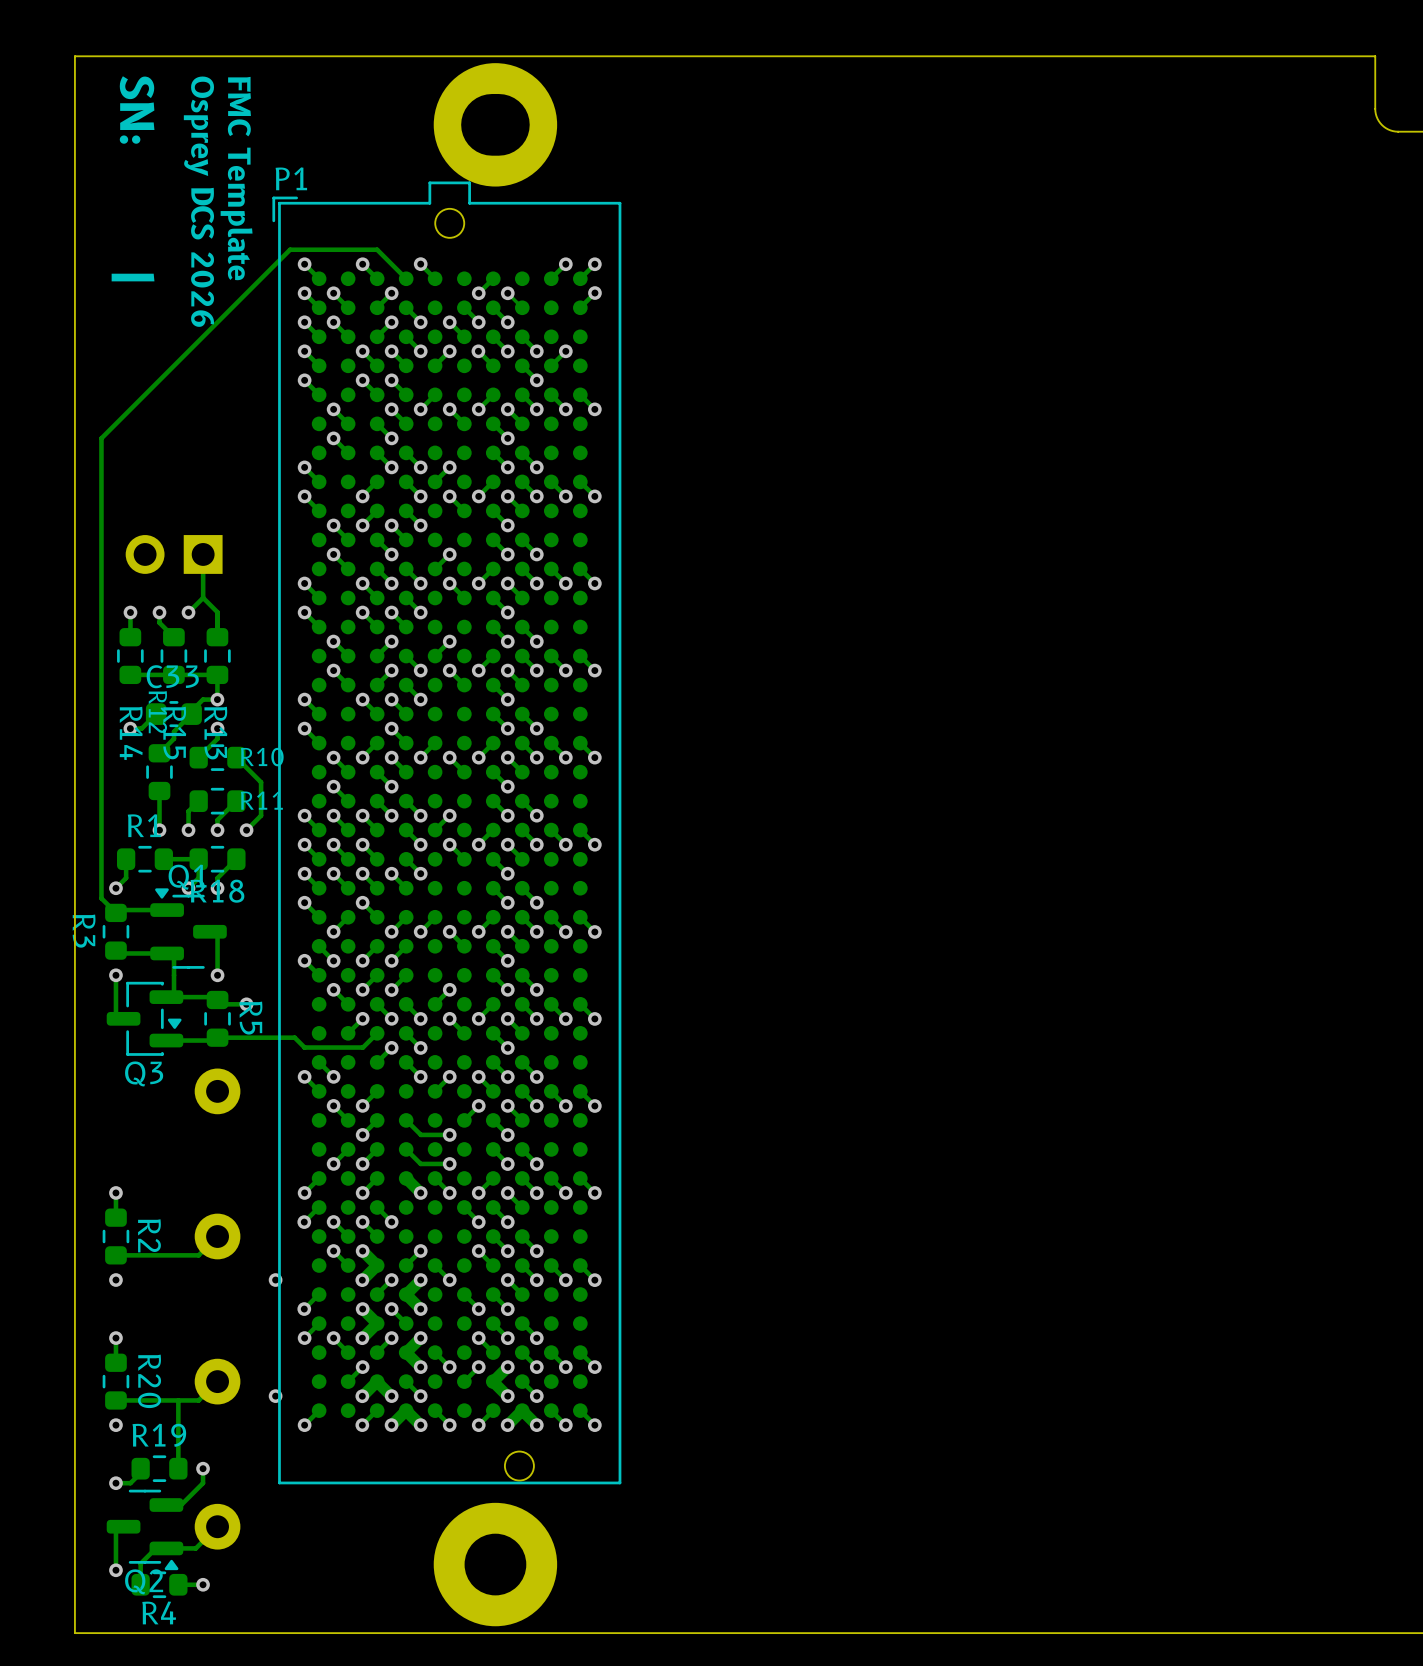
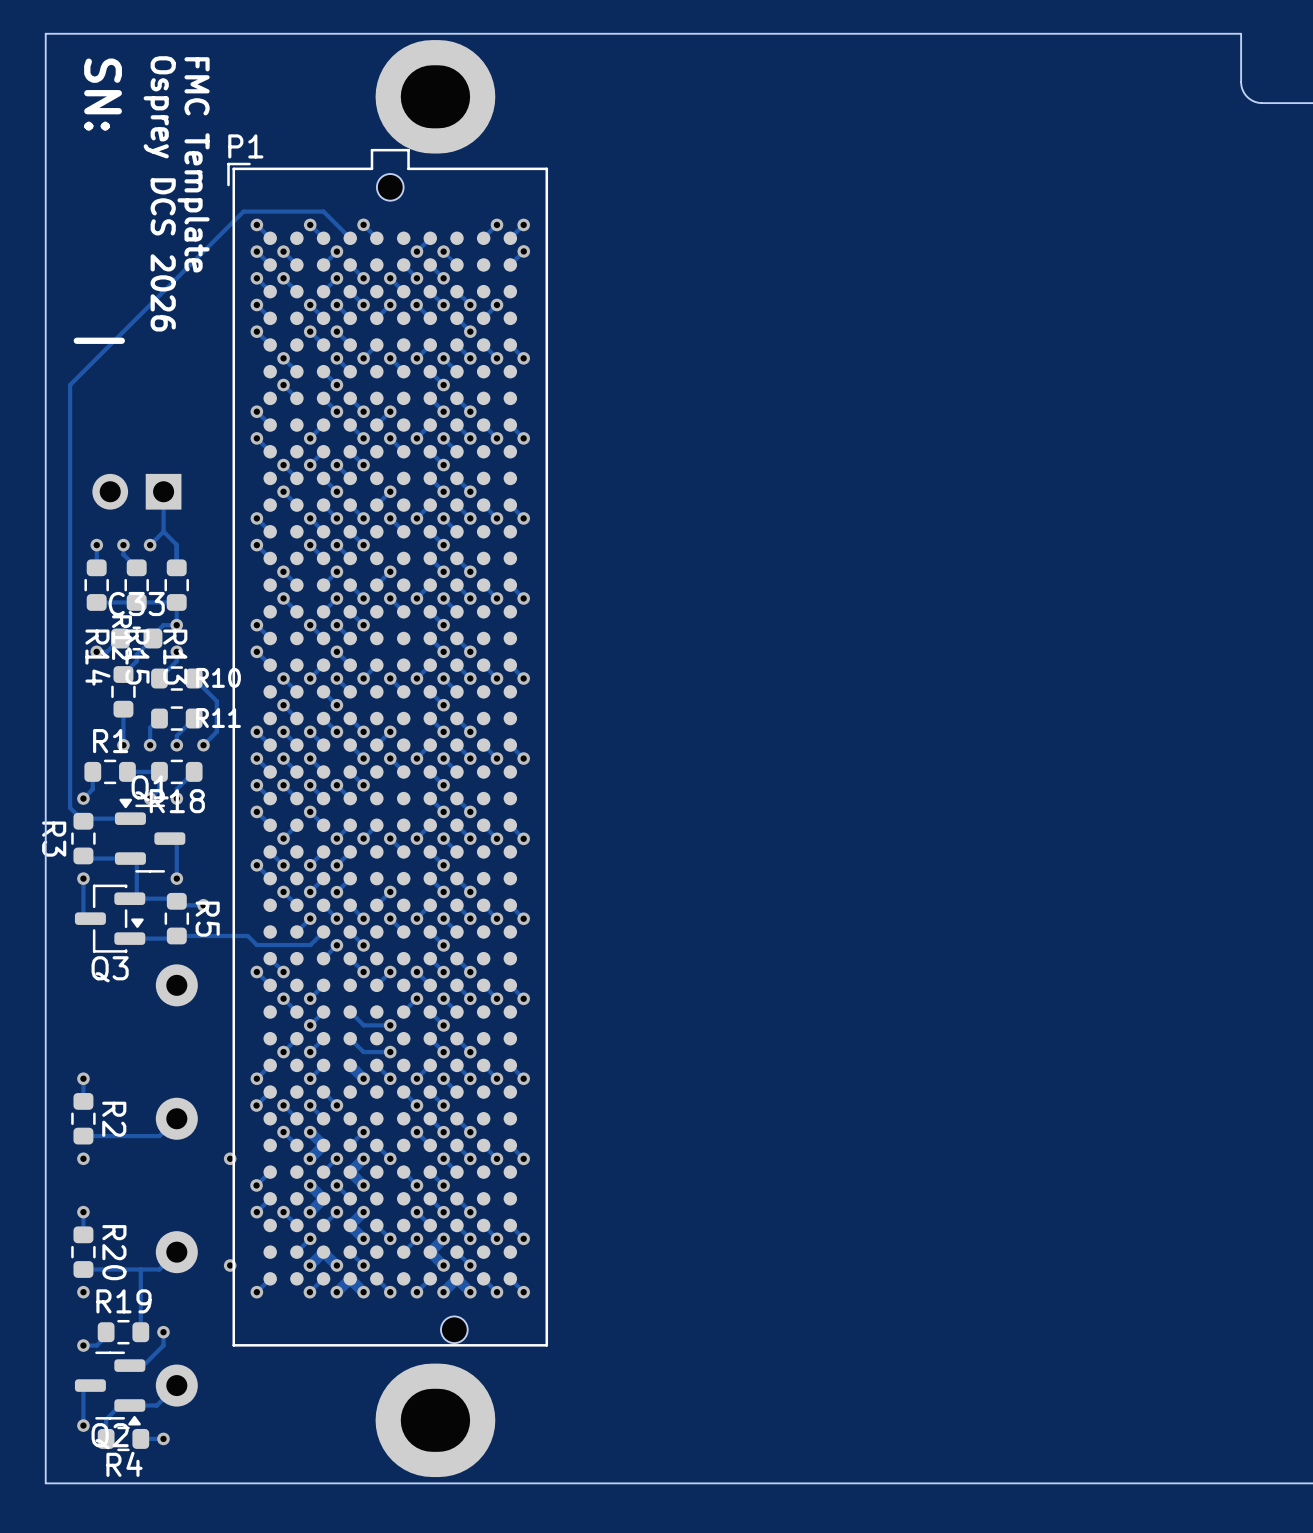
part footprint: [433, 63, 558, 187] -> [375, 40, 496, 154]
part footprint: [433, 1502, 558, 1627] -> [375, 1363, 496, 1478]

